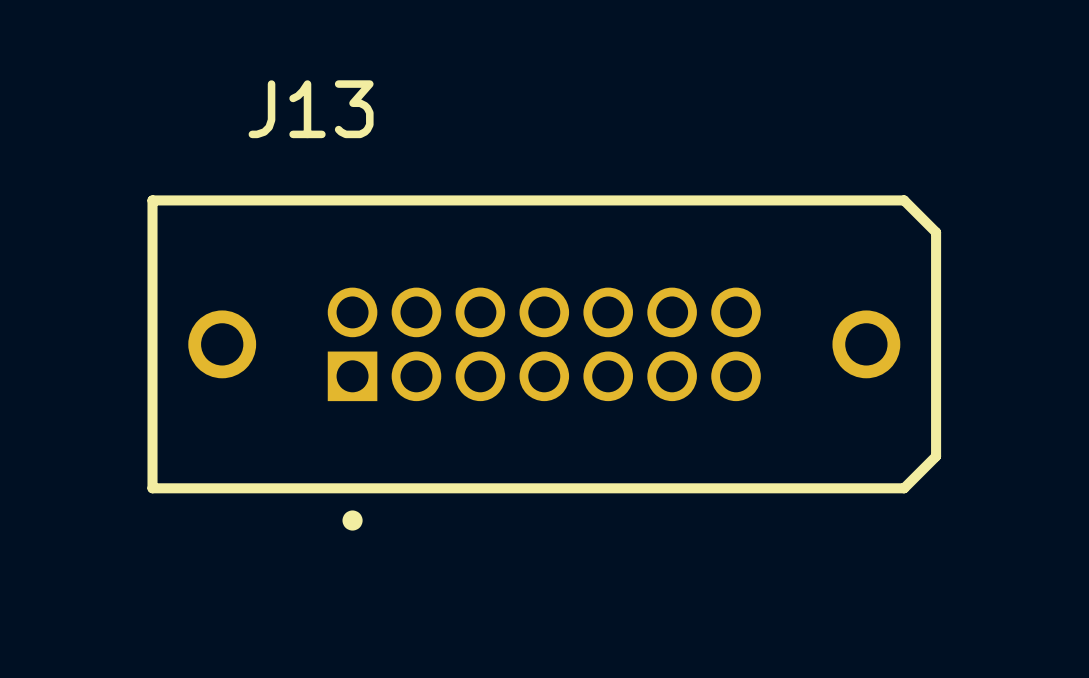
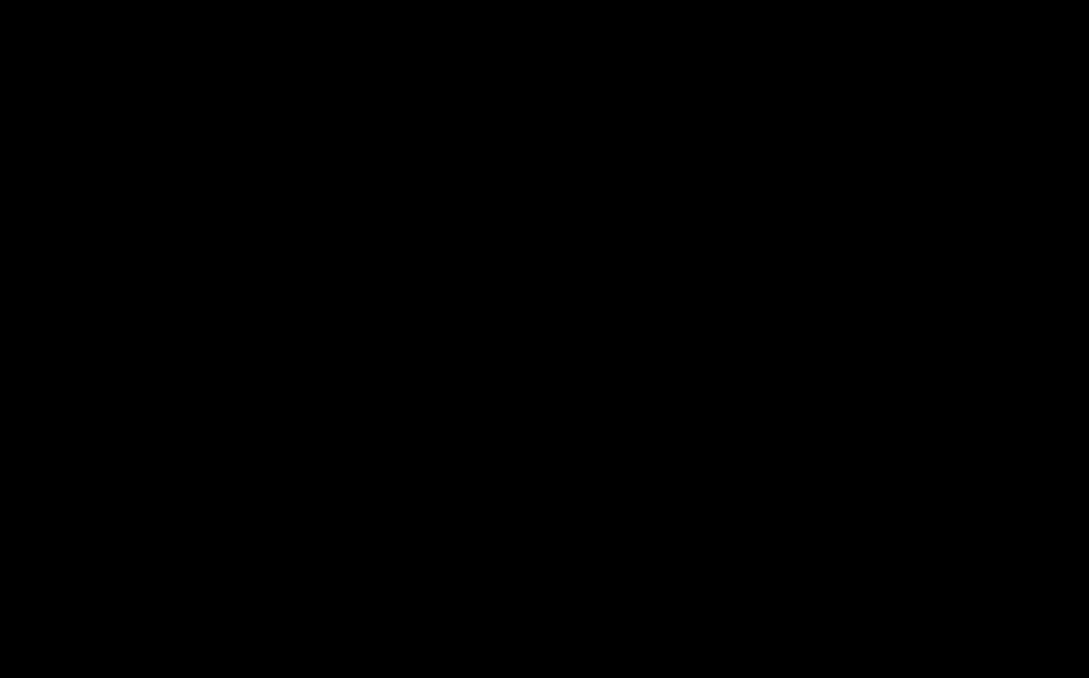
J13: (544, 362) -> none

